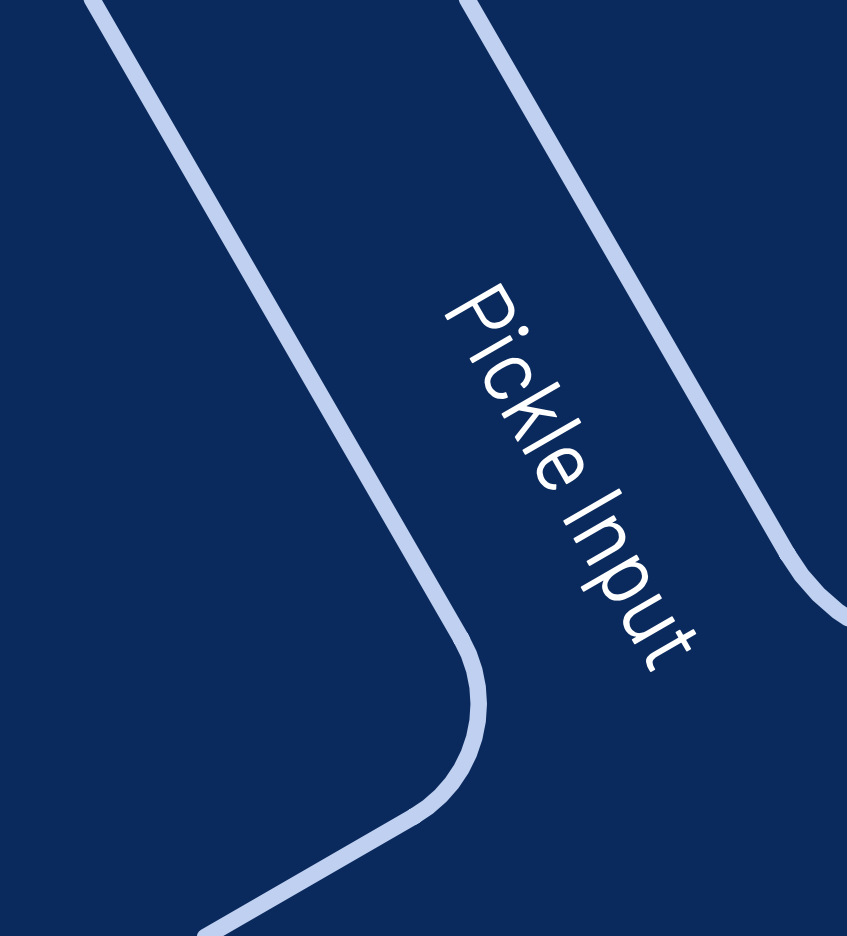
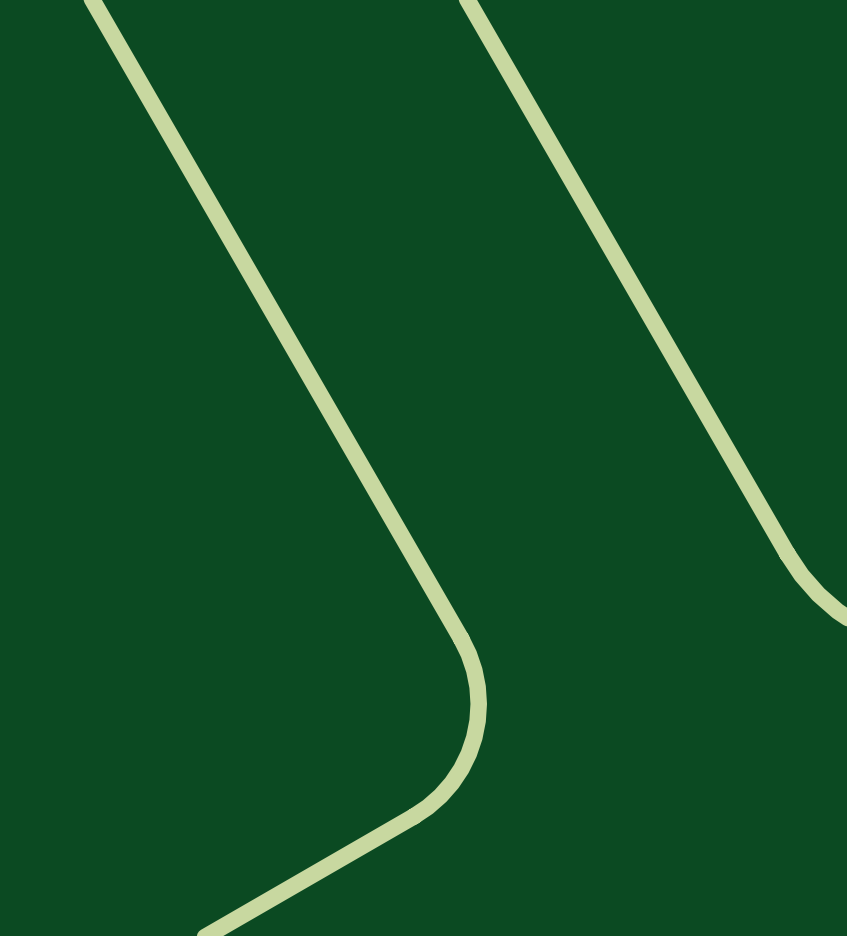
text: Pickle Input (570, 477) -> none

